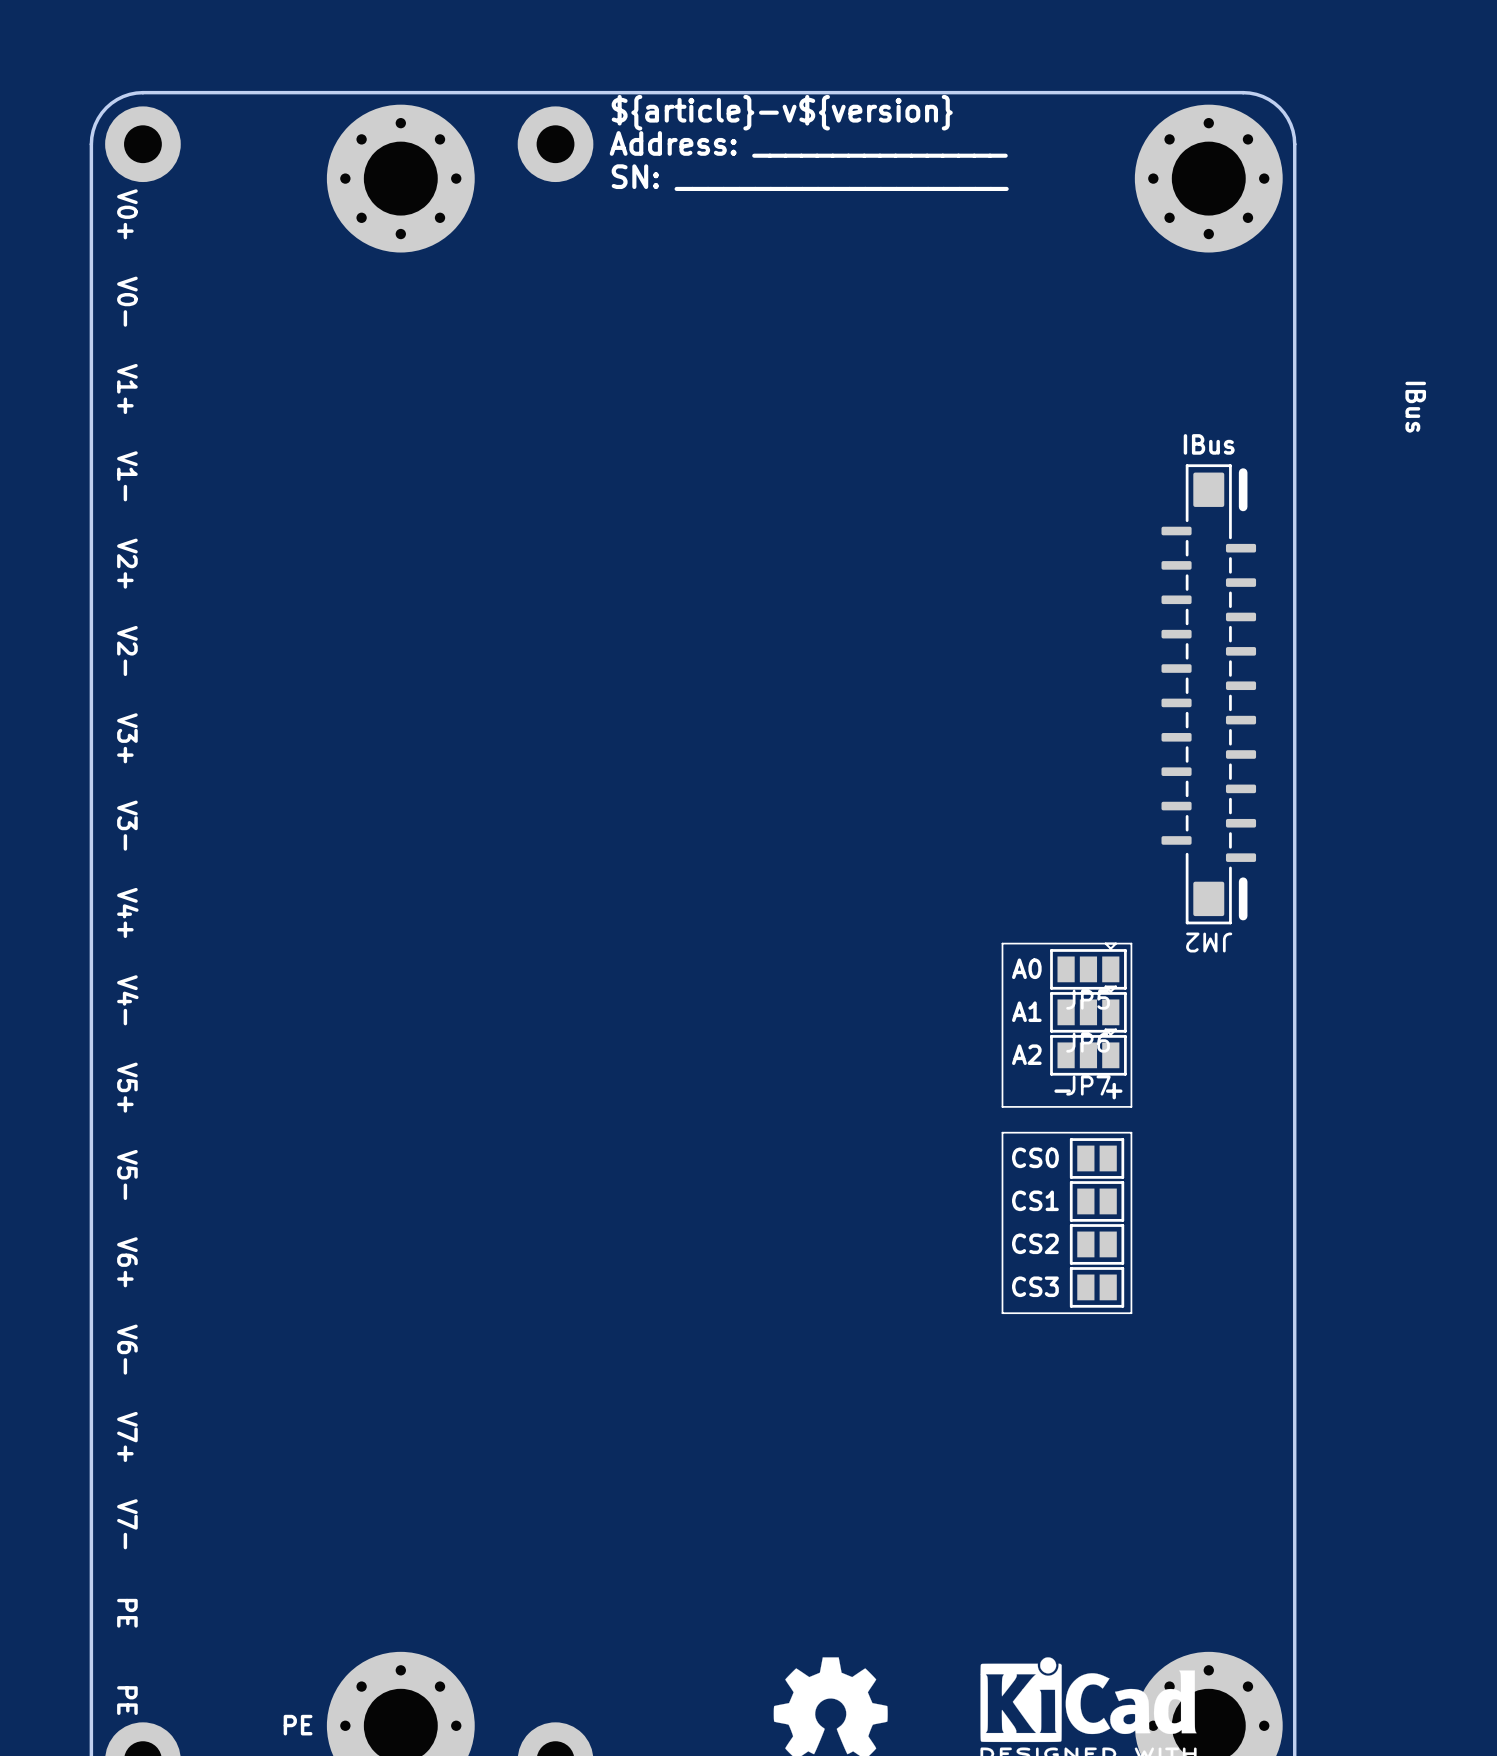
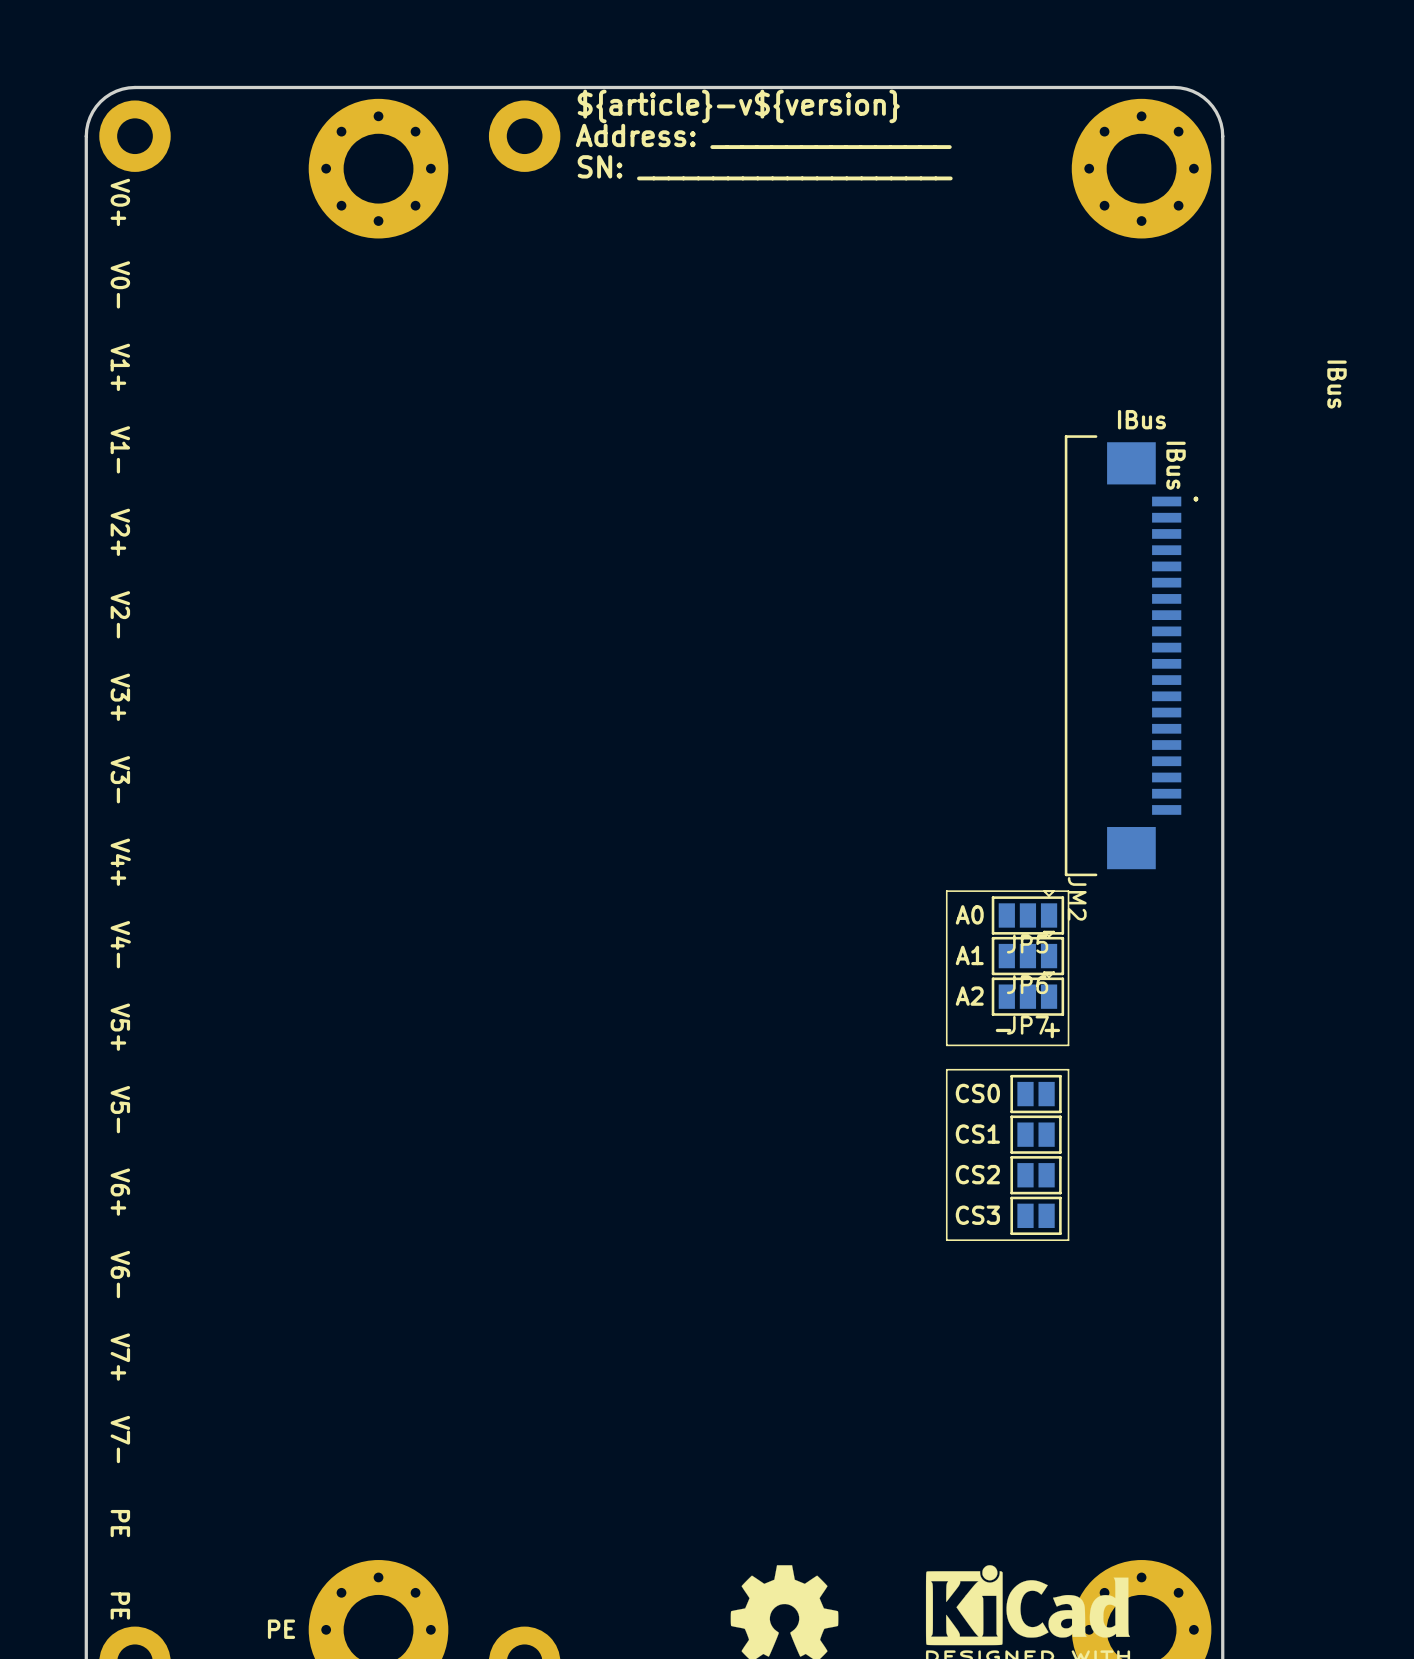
JM2 footprint: [1161, 464, 1257, 925] -> [1064, 435, 1199, 877]
text: none -> IBus (1176, 465)
JM2 name position: JM2 (1209, 942) -> JM2 (1077, 898)

